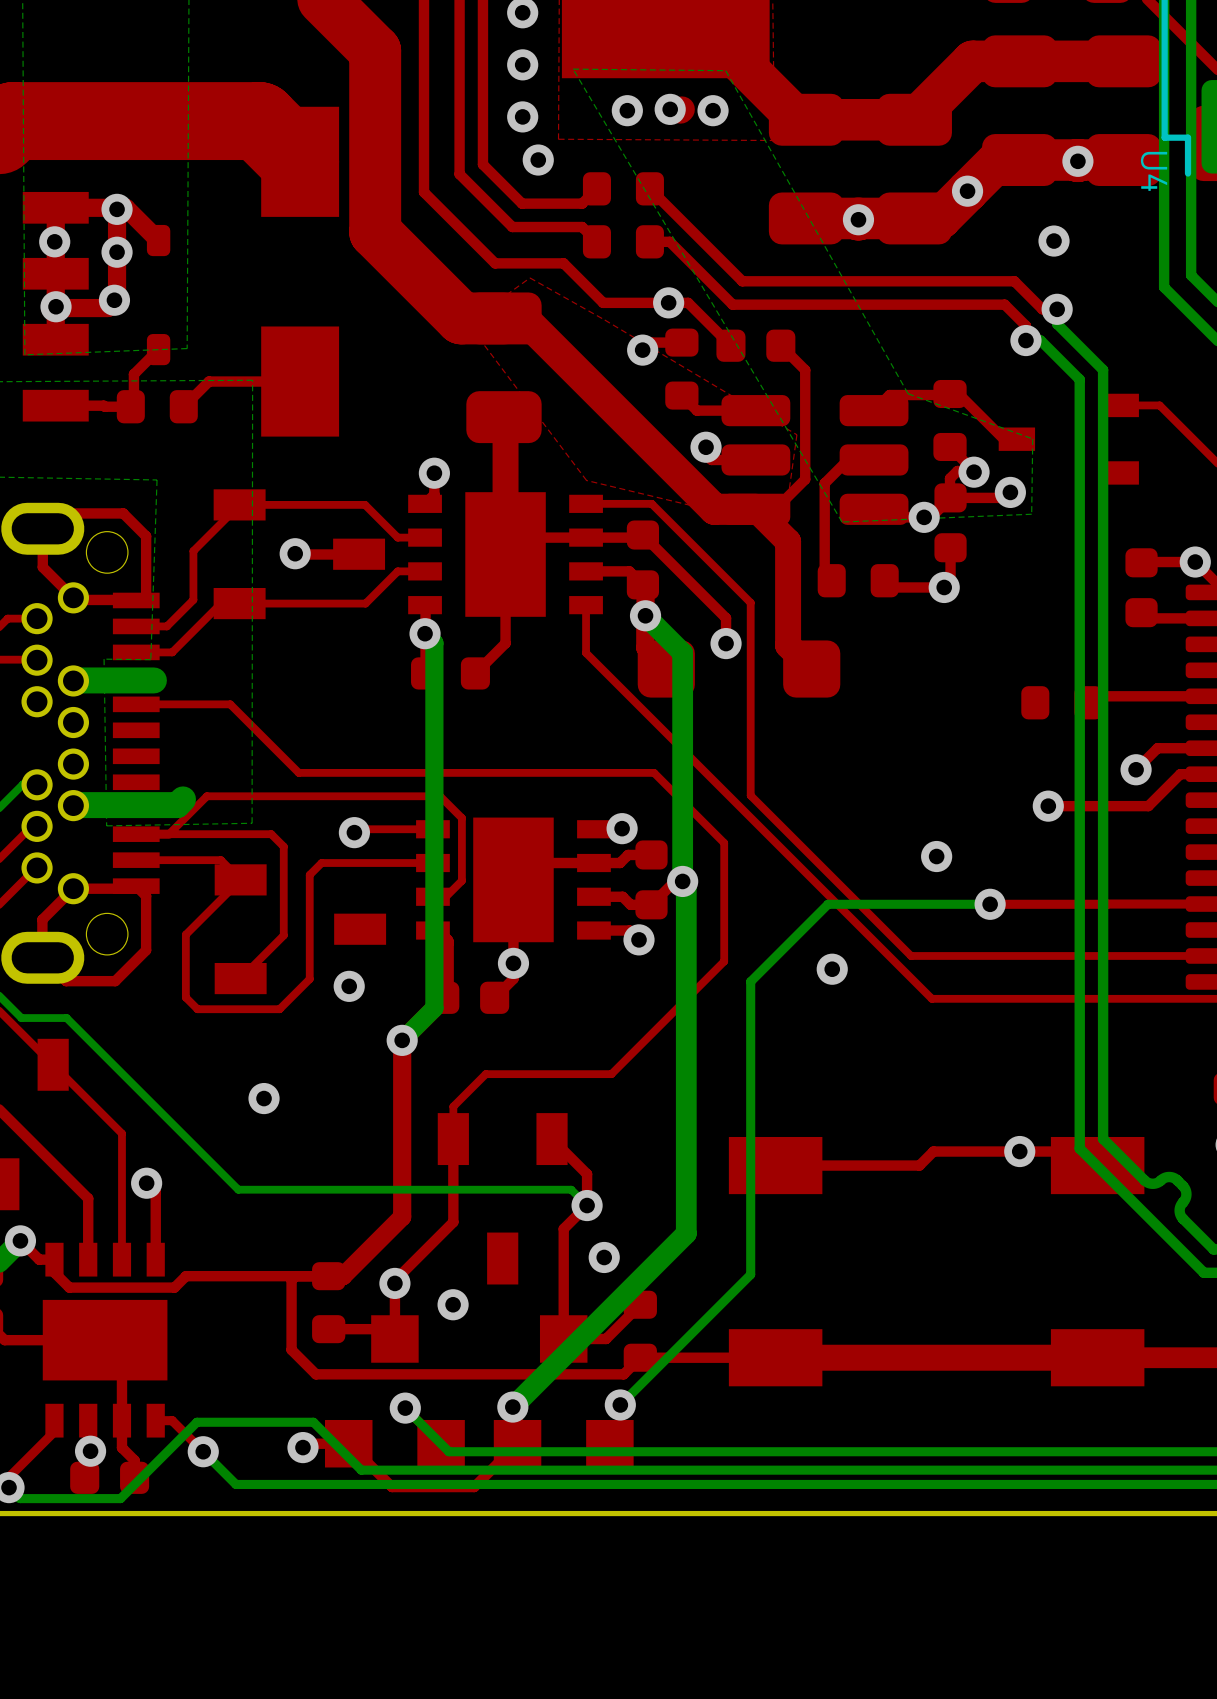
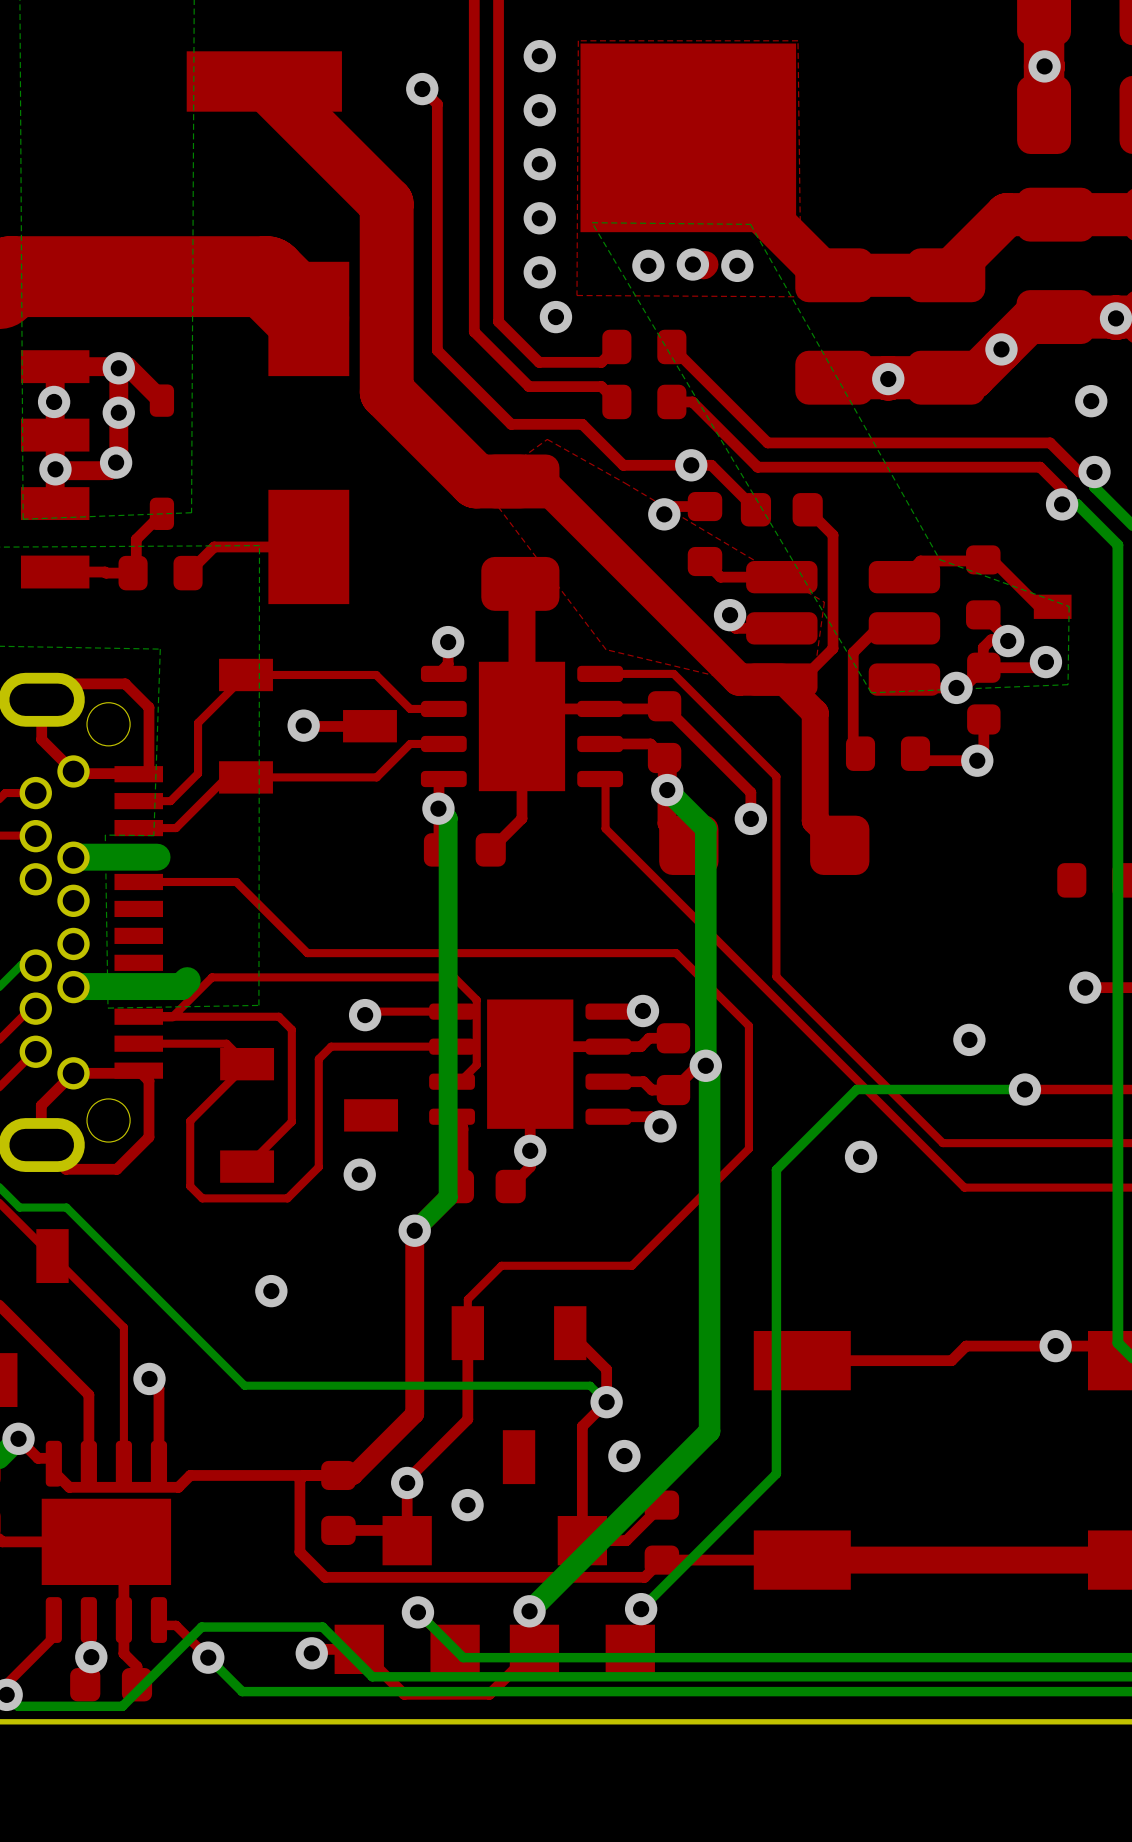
part footprint: [408, 492, 603, 617] -> [420, 661, 624, 792]
part footprint: [416, 817, 611, 943] -> [429, 999, 632, 1129]
part footprint: [42, 1242, 168, 1438] -> [41, 1440, 172, 1643]

